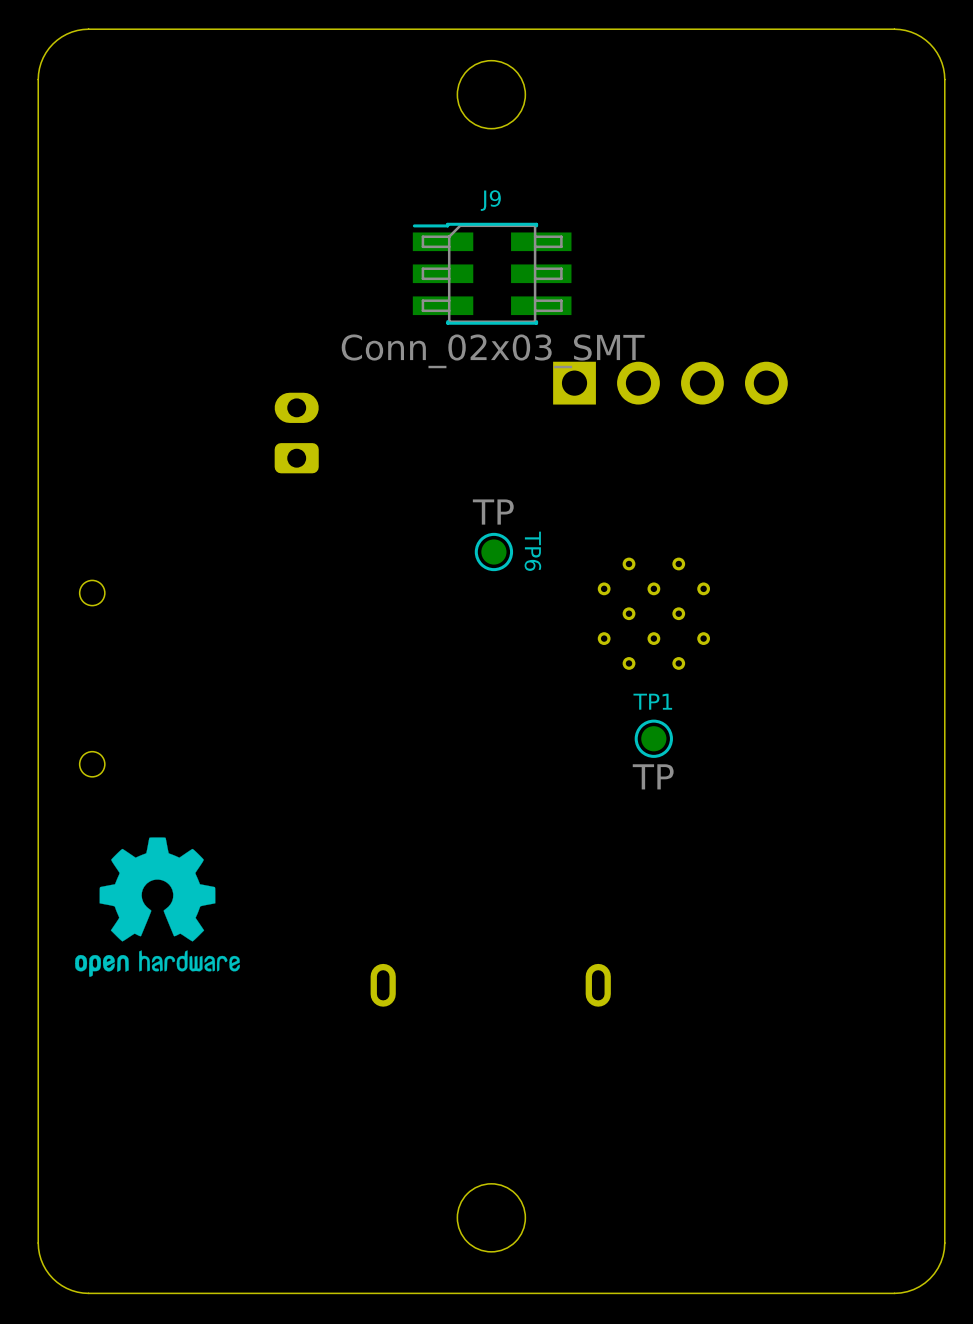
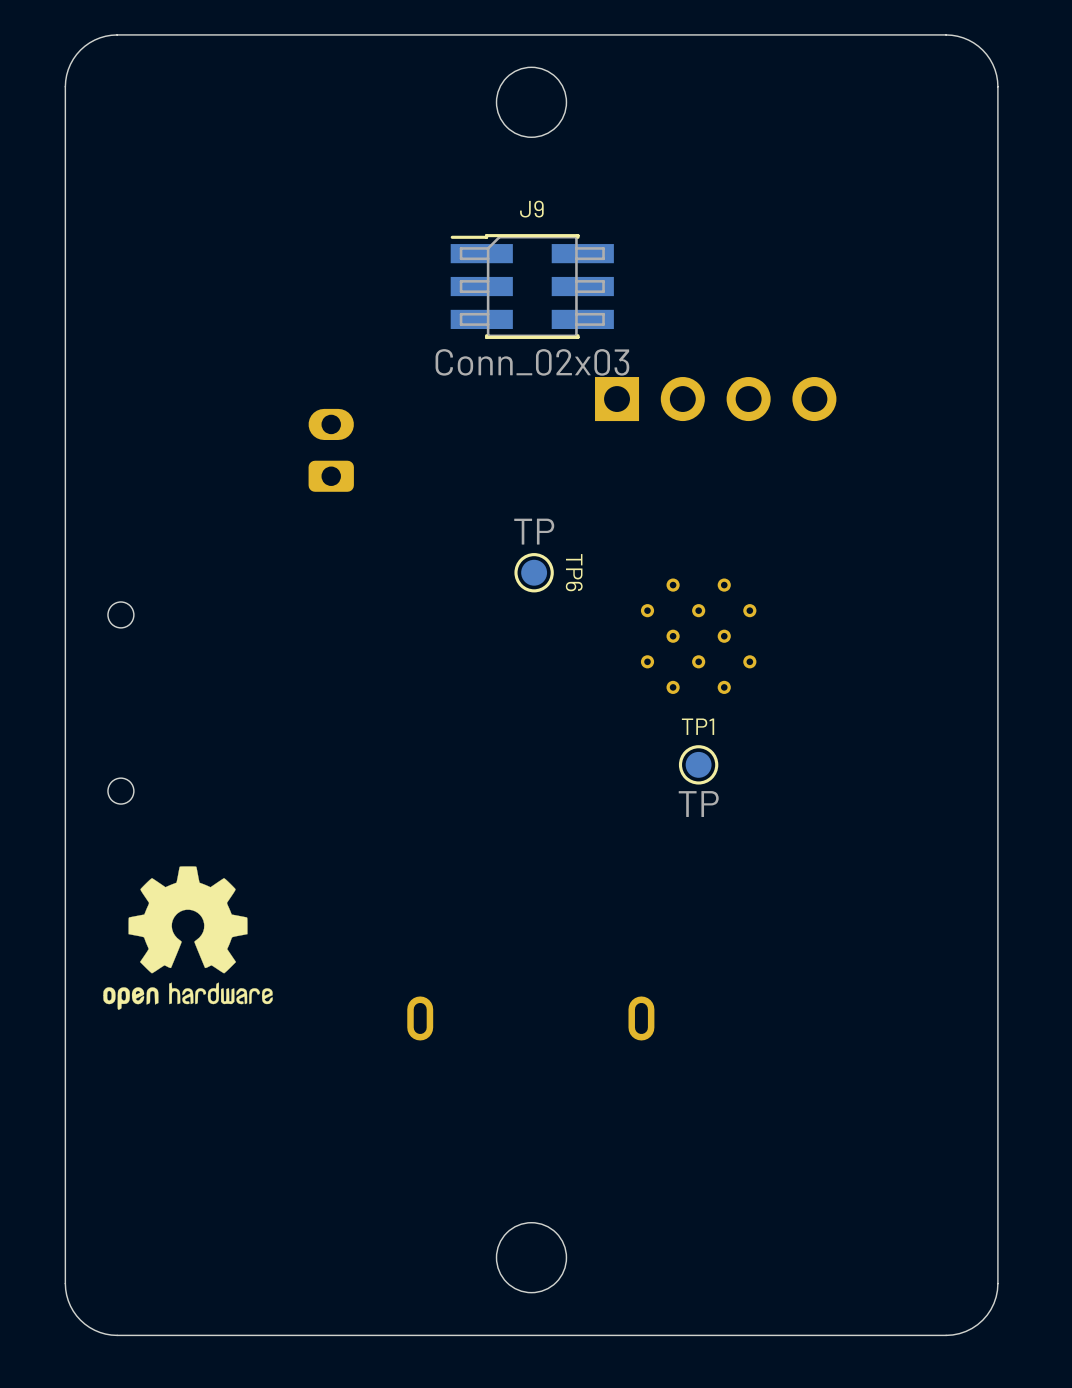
J9 value: Conn_02x03_SMT (493, 351) -> Conn_02x03 (532, 362)

